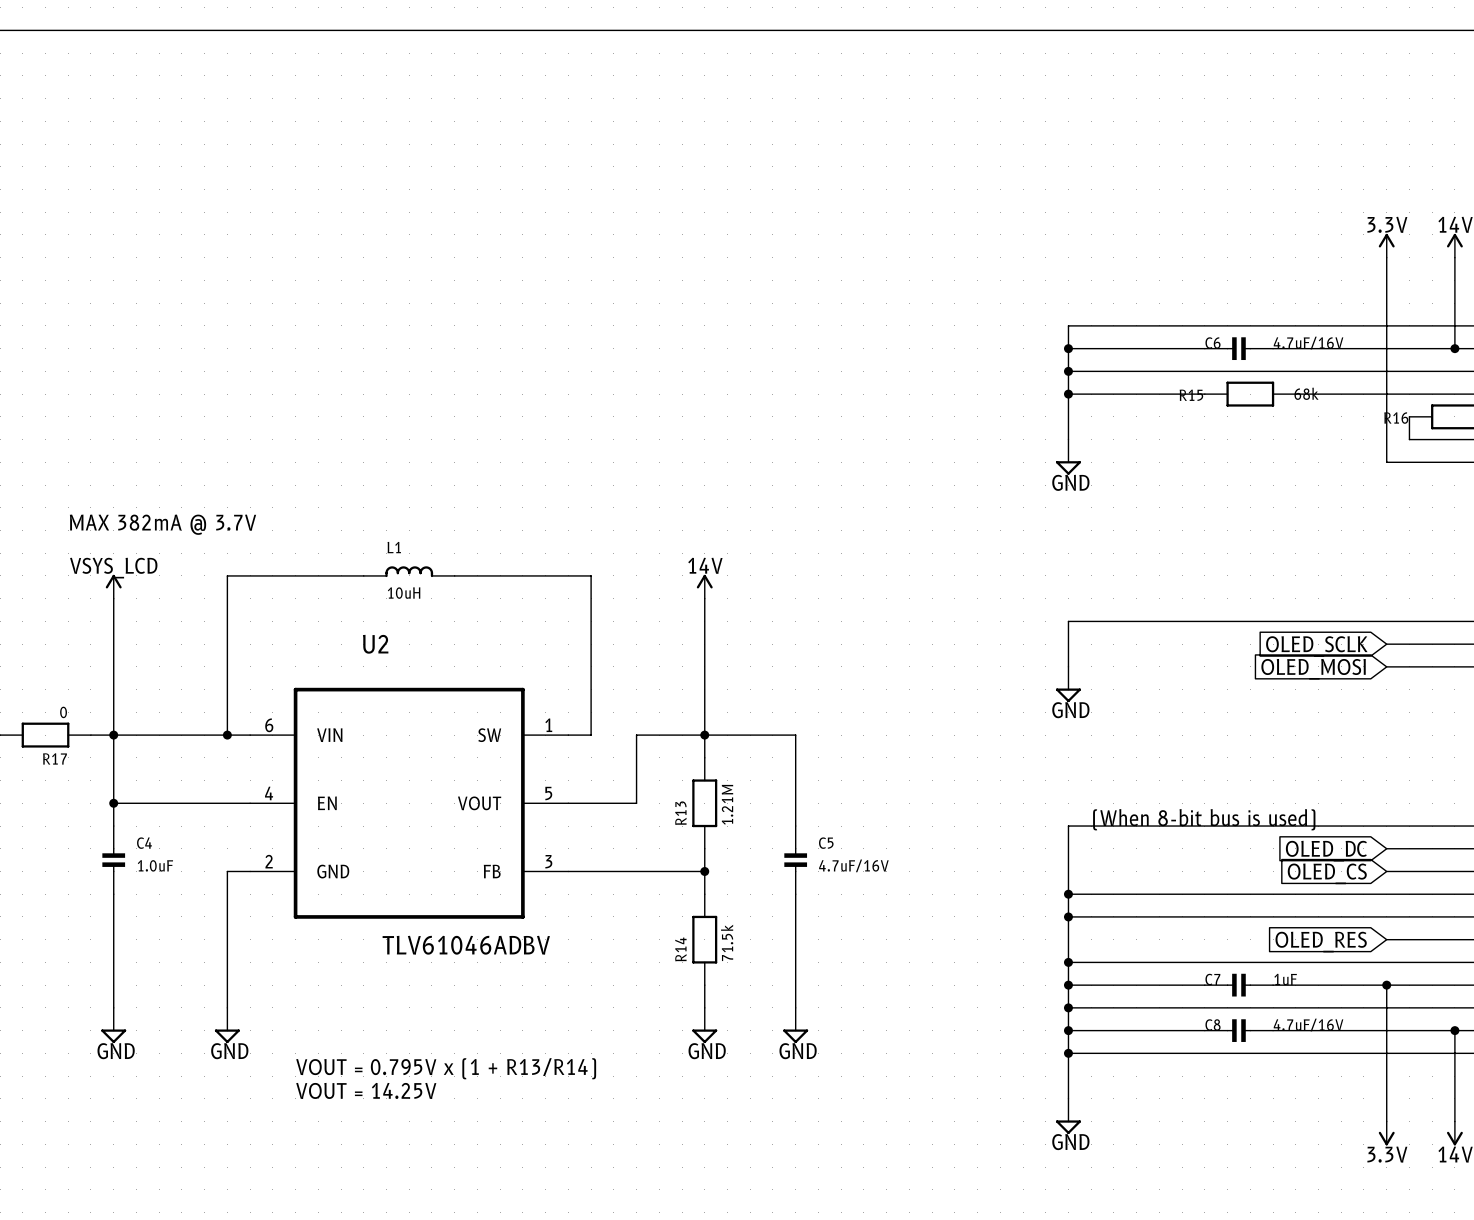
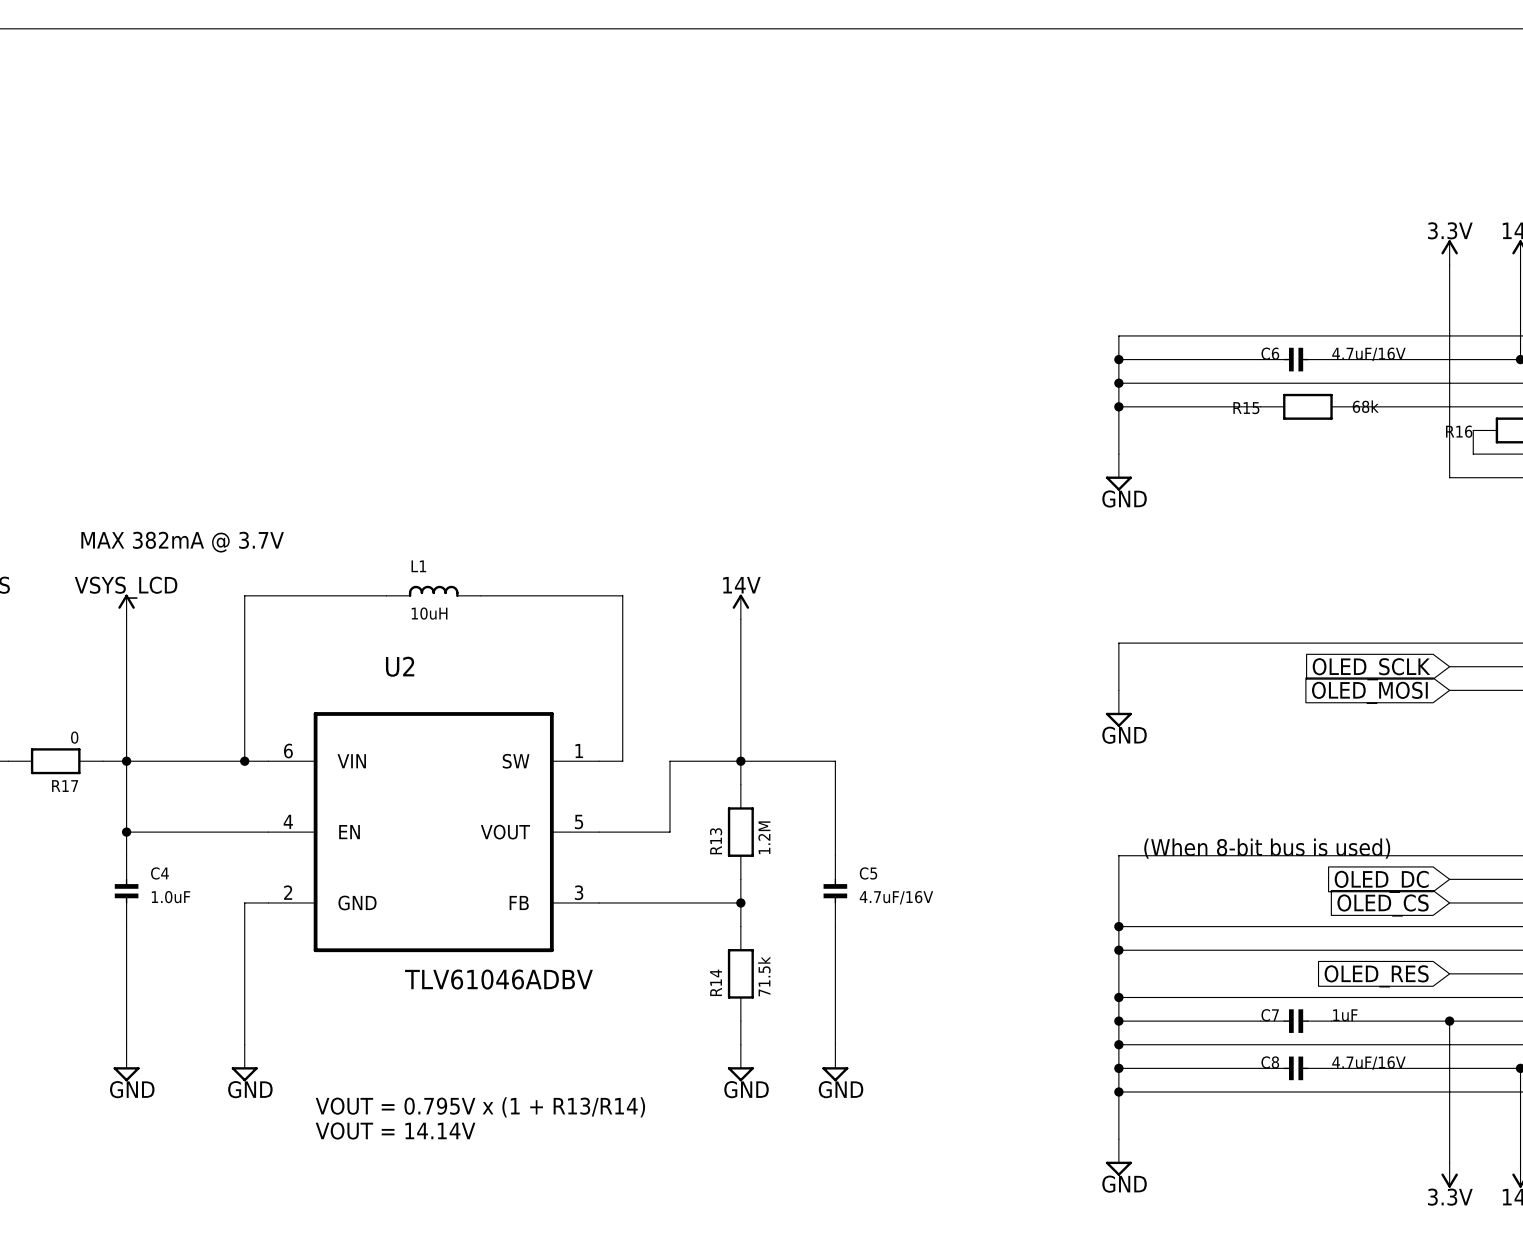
R13 value: 1.21M (727, 804) -> 1.2M (764, 837)
text: VOUT = 14.25V (366, 1090) -> VOUT = 14.14V (395, 1130)

